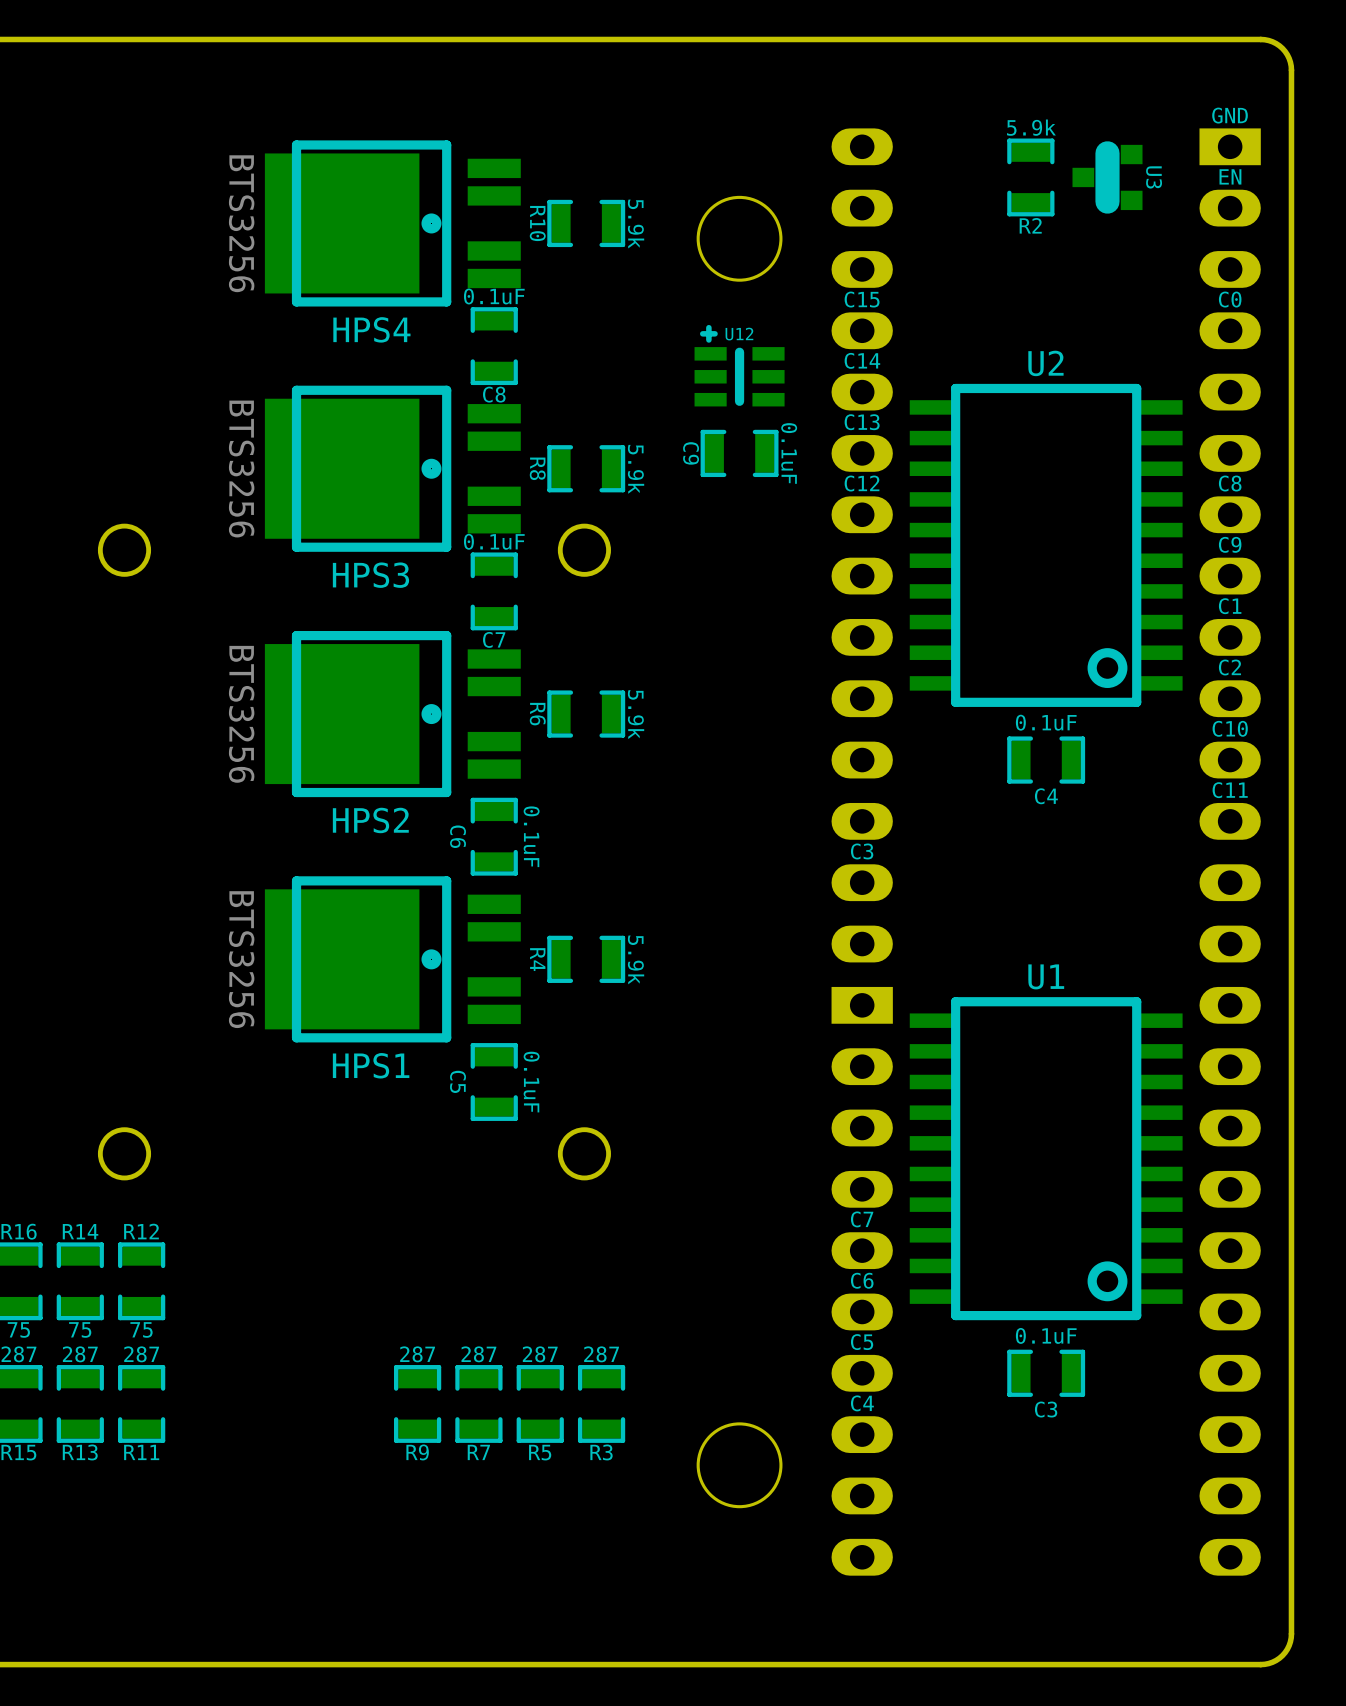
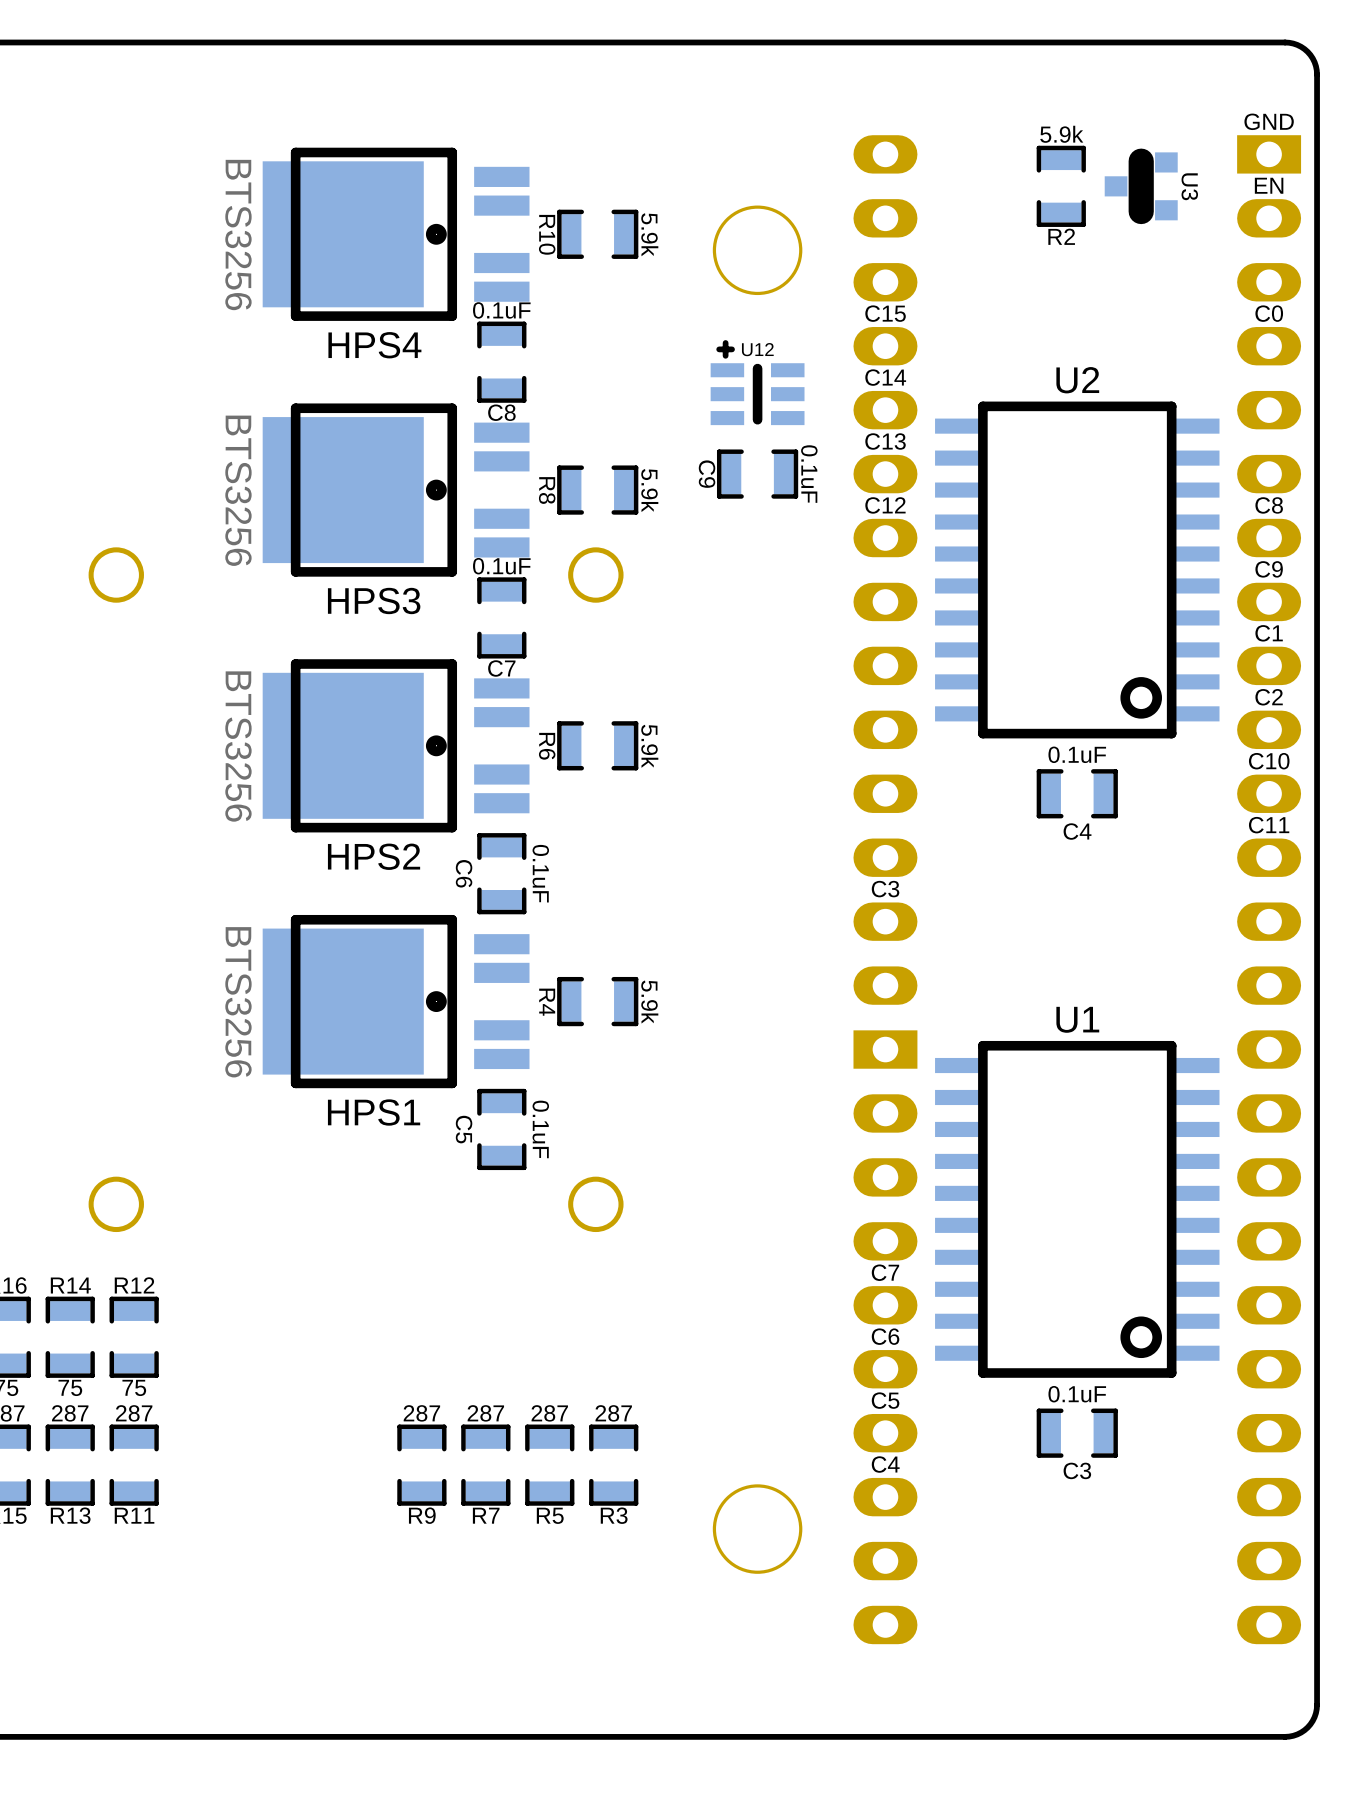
board edge: (1245, 39) (1264, 39) (1276, 43) (1287, 54) (1291, 70) (1291, 1633) (1287, 1649) (1276, 1660) (1264, 1664) (1245, 1664) -> (1317, 74) (1317, 1704) (1314, 1717) (1307, 1727) (1297, 1734) (1285, 1736)
board edge: none -> (1285, 42) (1297, 44) (1307, 51) (1314, 62) (1317, 74)

